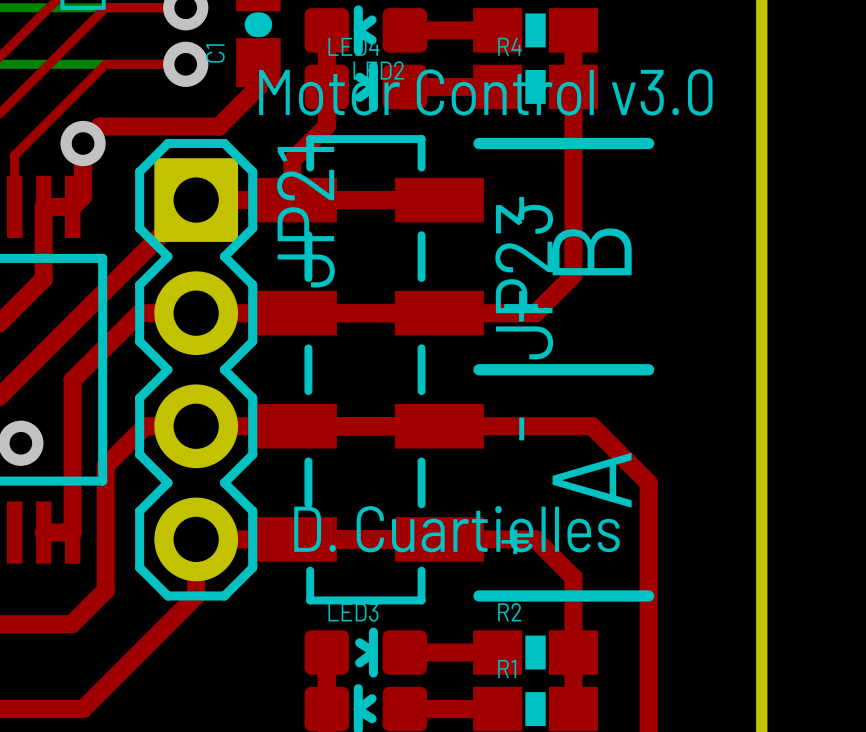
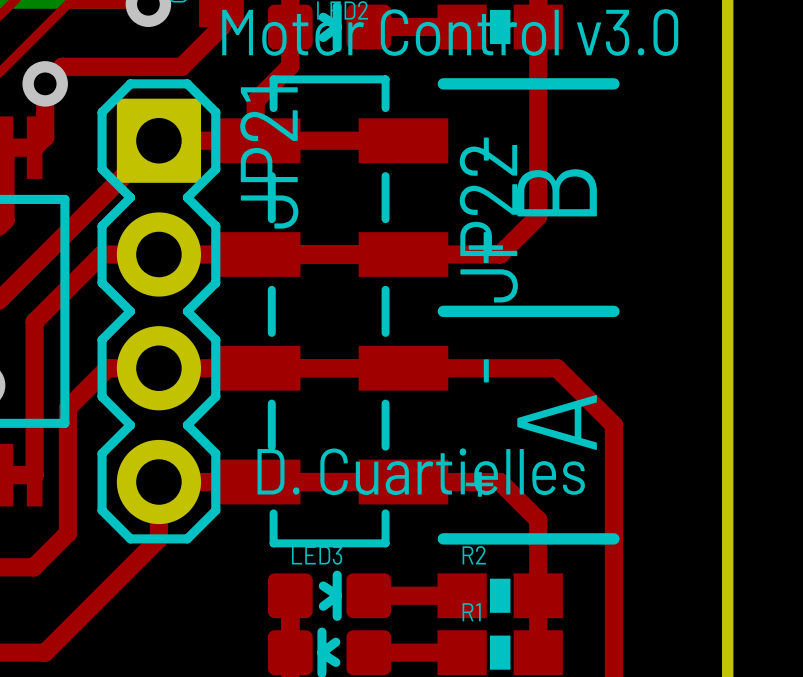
JP23 name: JP23 (524, 282) -> JP22 (488, 223)

